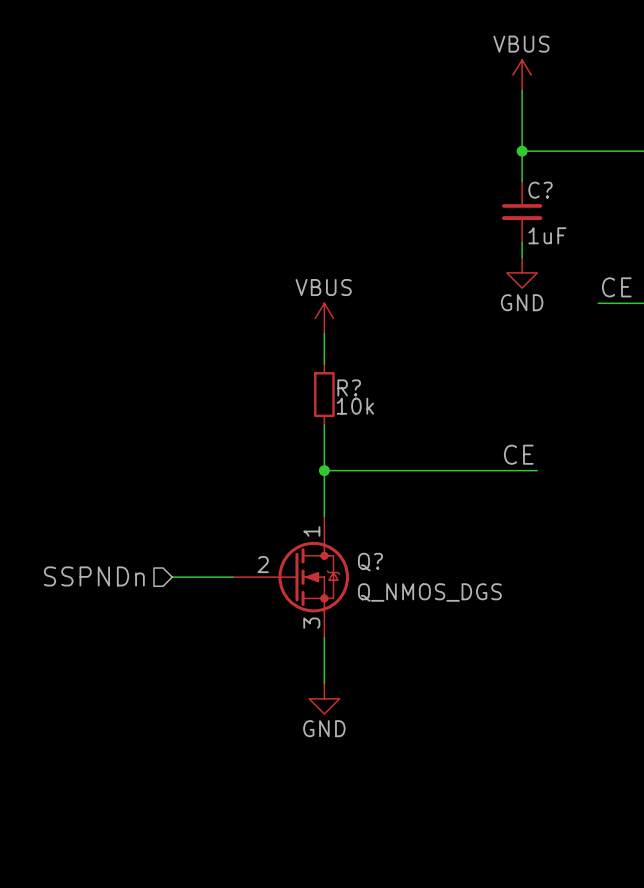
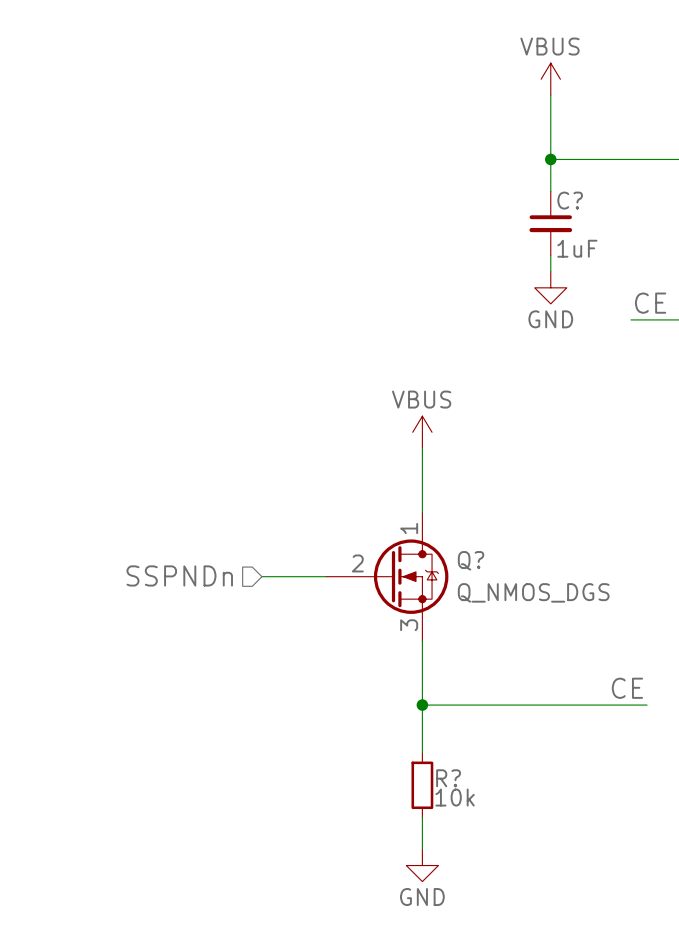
power symbol position: VBUS (324, 318) -> VBUS (422, 432)
wire: (324, 333) (324, 364) -> none
R?: 10k (324, 394) -> none
wire: (324, 425) (324, 516) -> none
wire: none -> (422, 448) (422, 512)
label position: CE (518, 454) -> CE (627, 688)
wire: (324, 470) (537, 470) -> (422, 705) (647, 705)
junction: (324, 470) -> none
hierarchical label position: SSPNDn (94, 576) -> SSPNDn (179, 575)
wire: (172, 577) (233, 577) -> (261, 576) (326, 576)
Q? position: (291, 577) -> (387, 576)
wire: none -> (422, 640) (422, 753)
wire: (324, 637) (324, 683) -> none
junction: none -> (422, 705)
power symbol position: GND (324, 698) -> GND (422, 865)
R?: none -> 10k (422, 785)
wire: none -> (422, 817) (422, 849)

